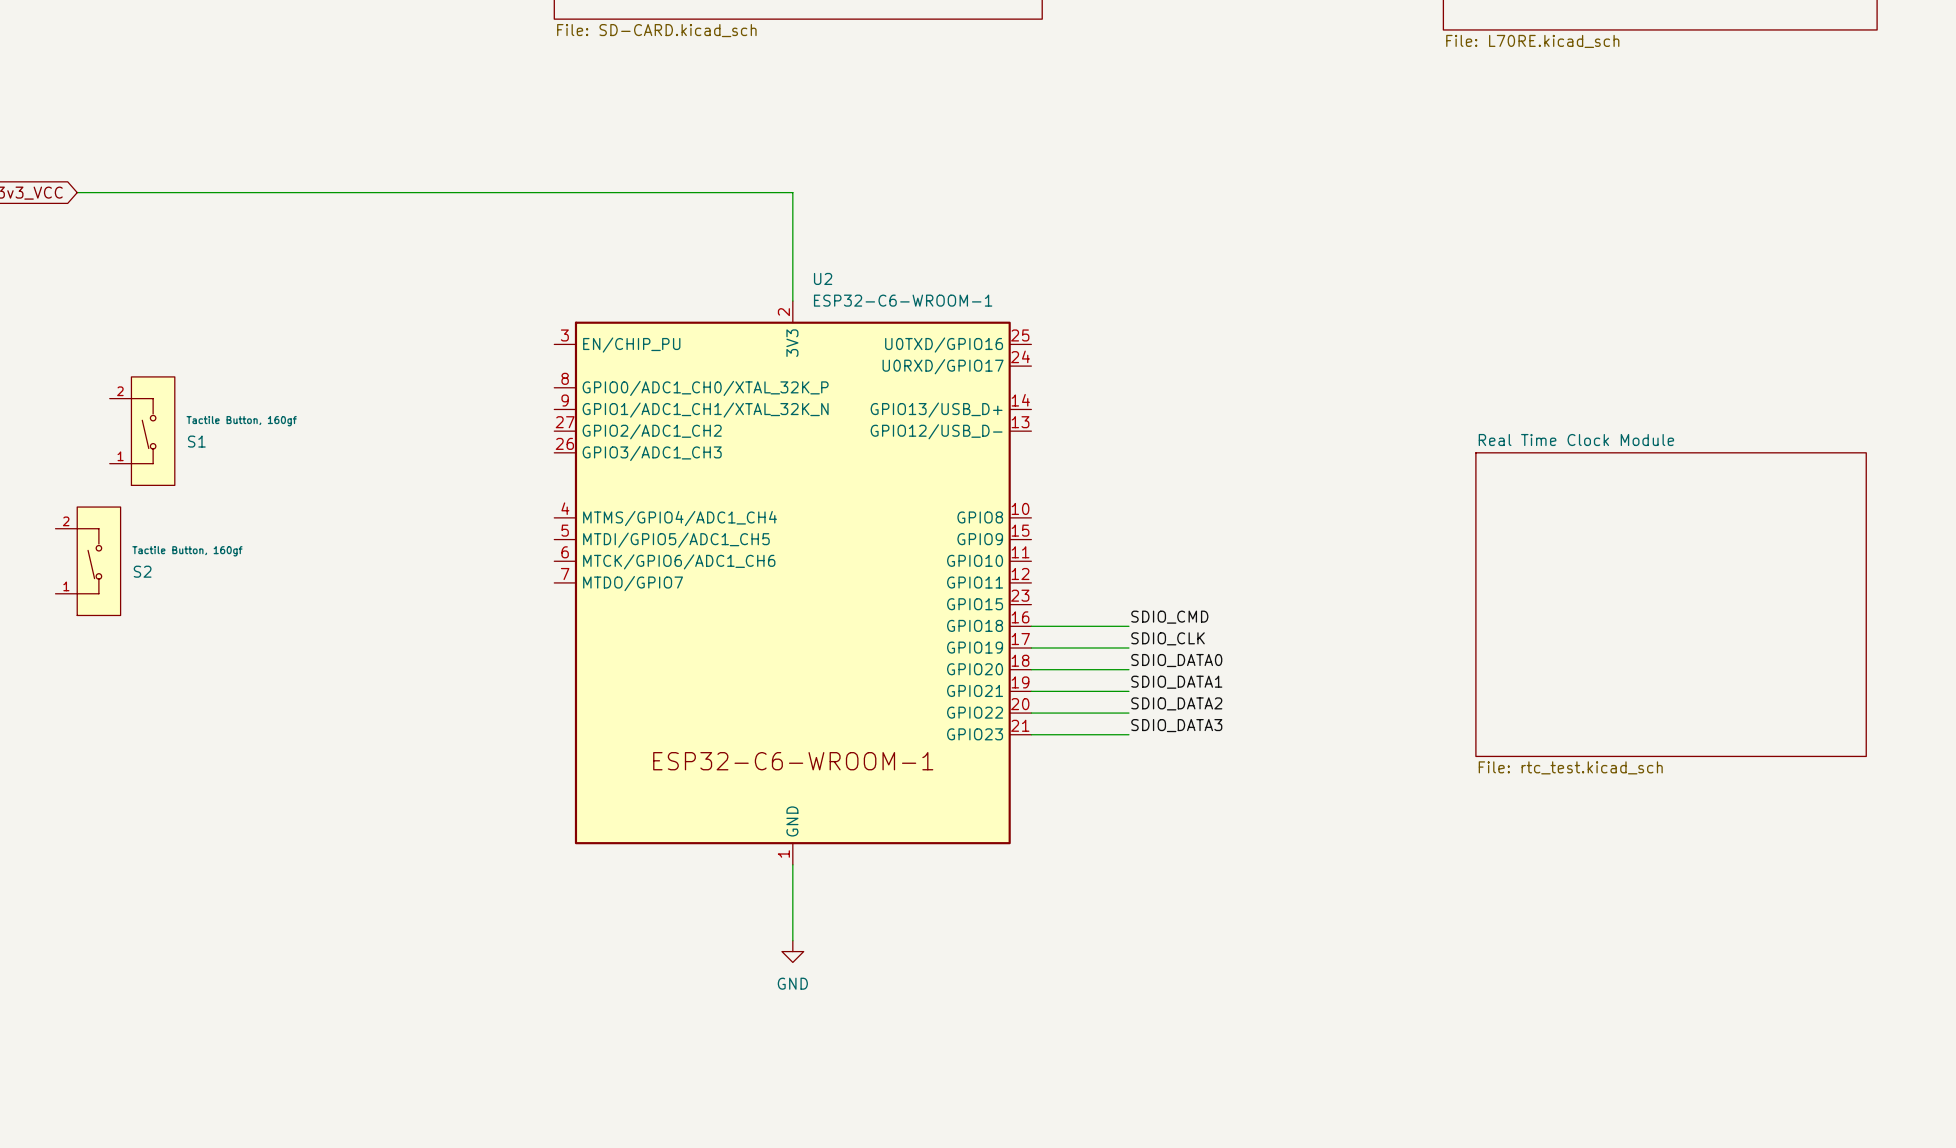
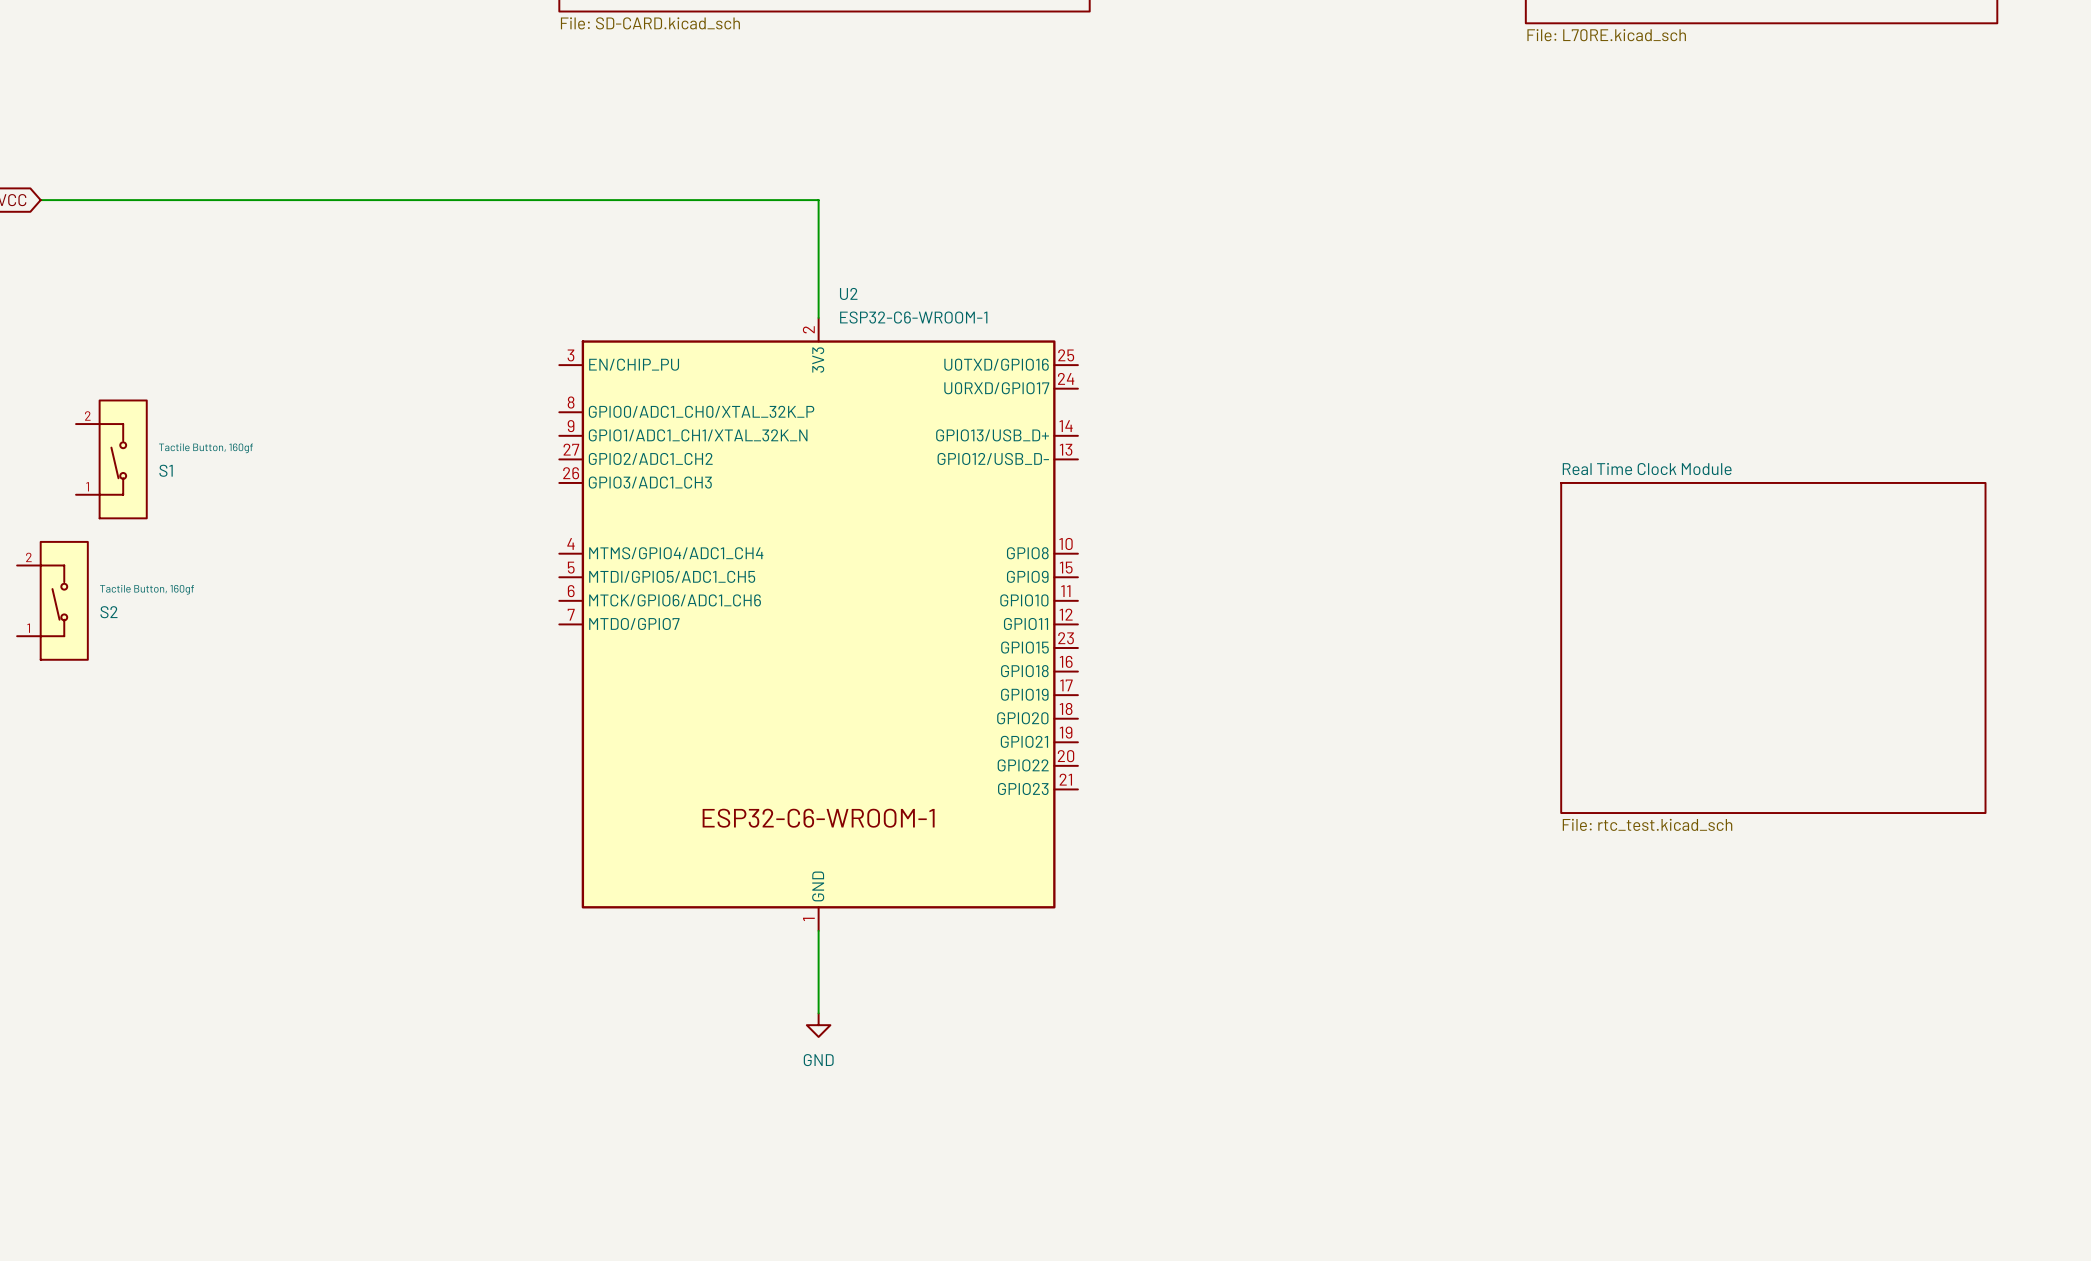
label: SDIO_CMD (1169, 617) -> none
wire: (1031, 626) (1128, 626) -> none
label: SDIO_CLK (1168, 638) -> none
wire: (1031, 648) (1128, 648) -> none
label: SDIO_DATA0 (1176, 660) -> none
wire: (1031, 669) (1128, 669) -> none
label: SDIO_DATA1 (1176, 682) -> none
wire: (1031, 691) (1128, 691) -> none
label: SDIO_DATA2 (1176, 703) -> none
wire: (1031, 713) (1128, 713) -> none
label: SDIO_DATA3 (1176, 725) -> none
wire: (1031, 734) (1128, 734) -> none

